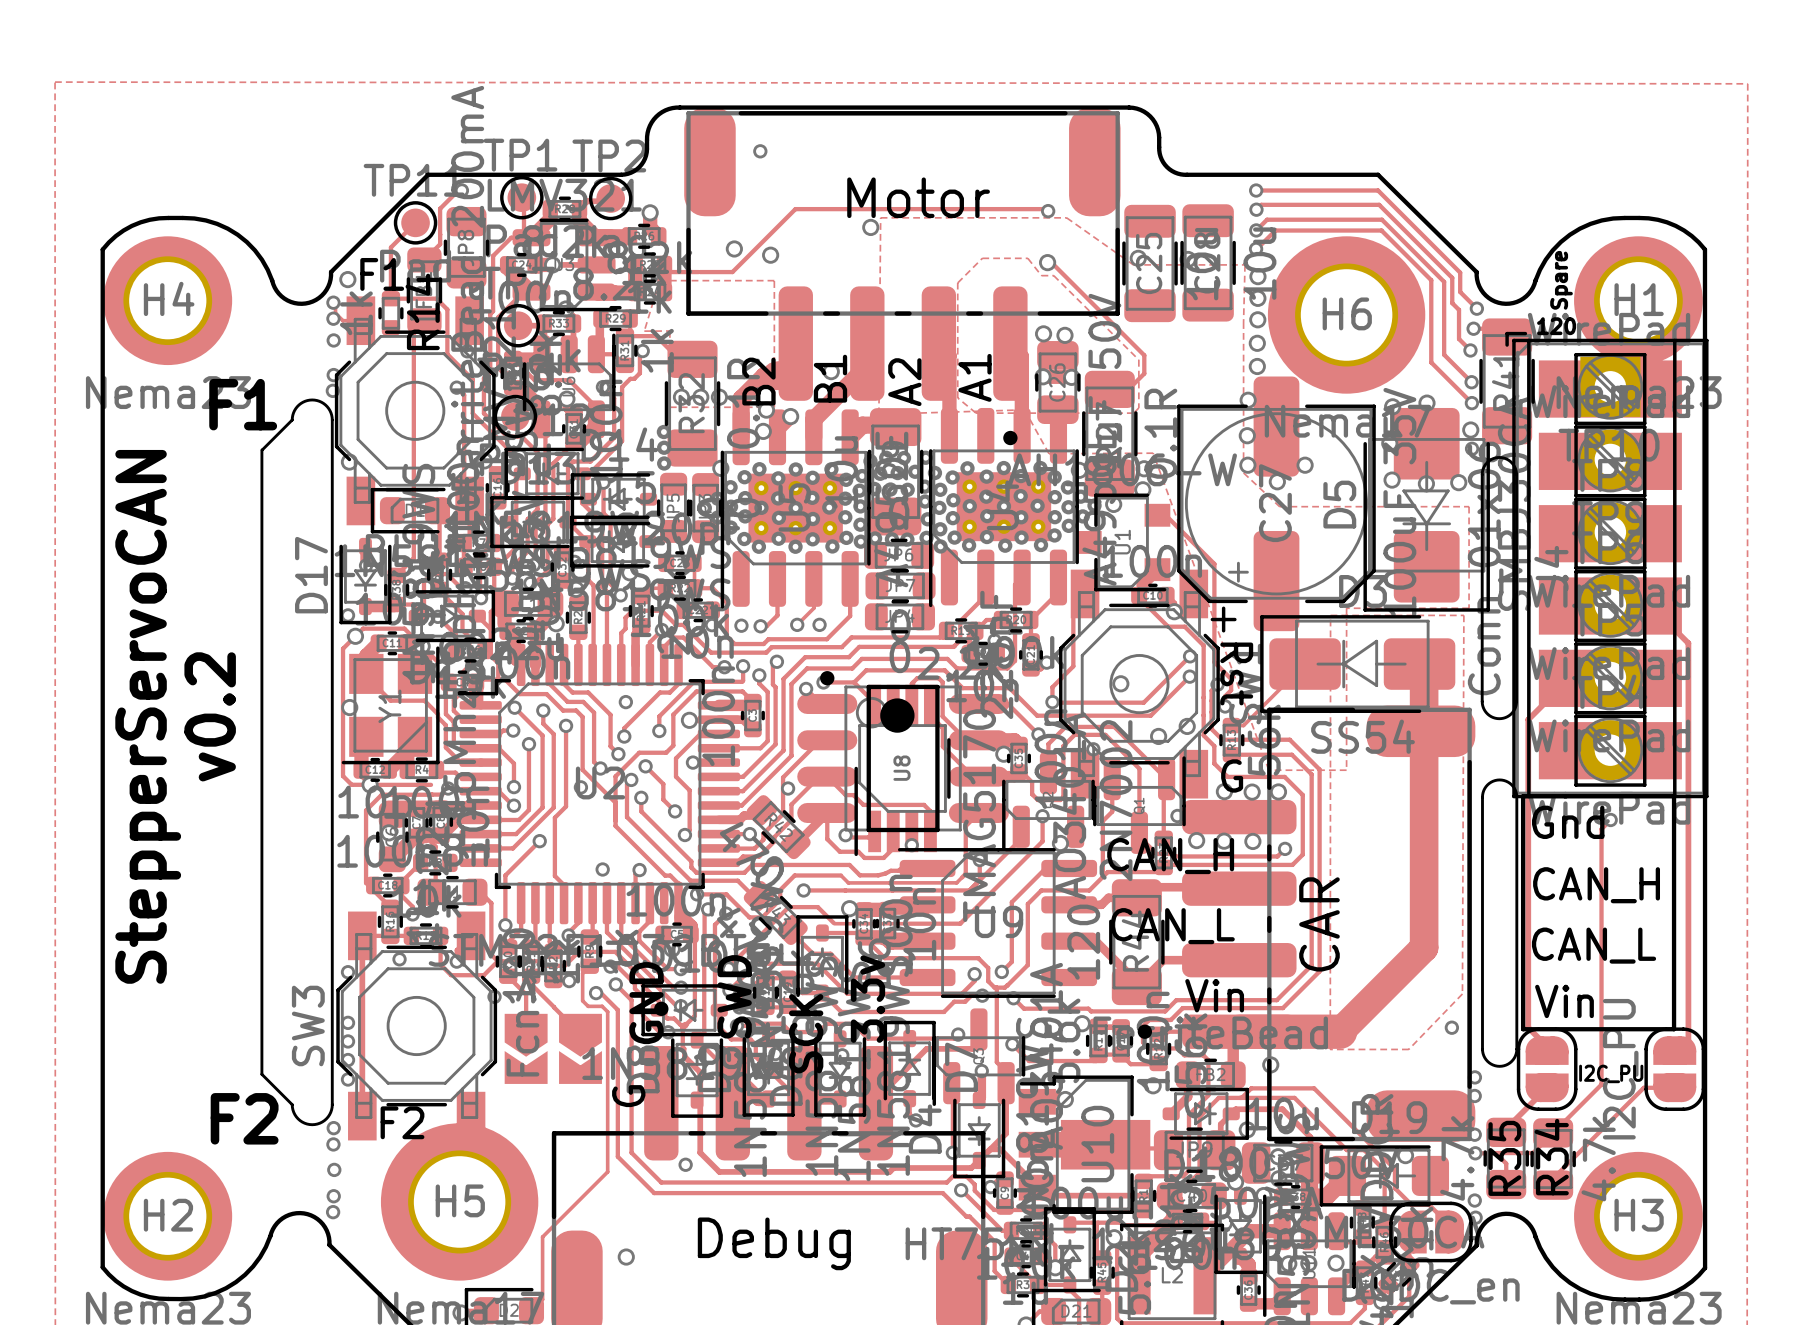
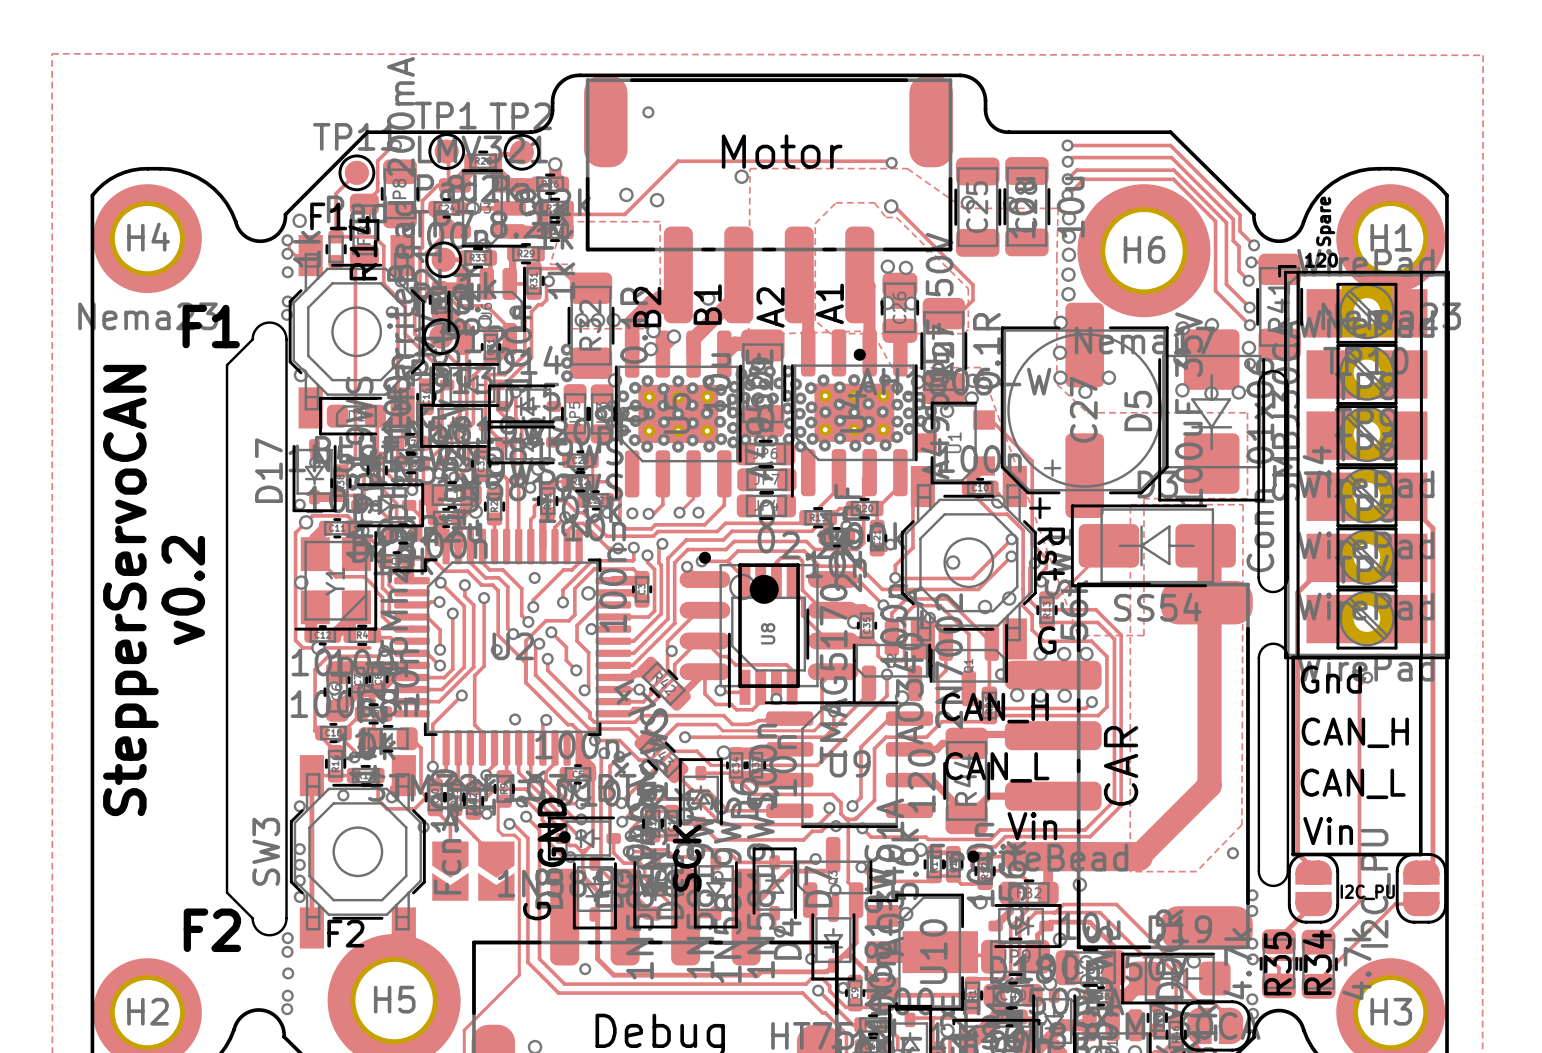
text: SWD (734, 996) -> none
text: 3.3v (867, 999) -> none

